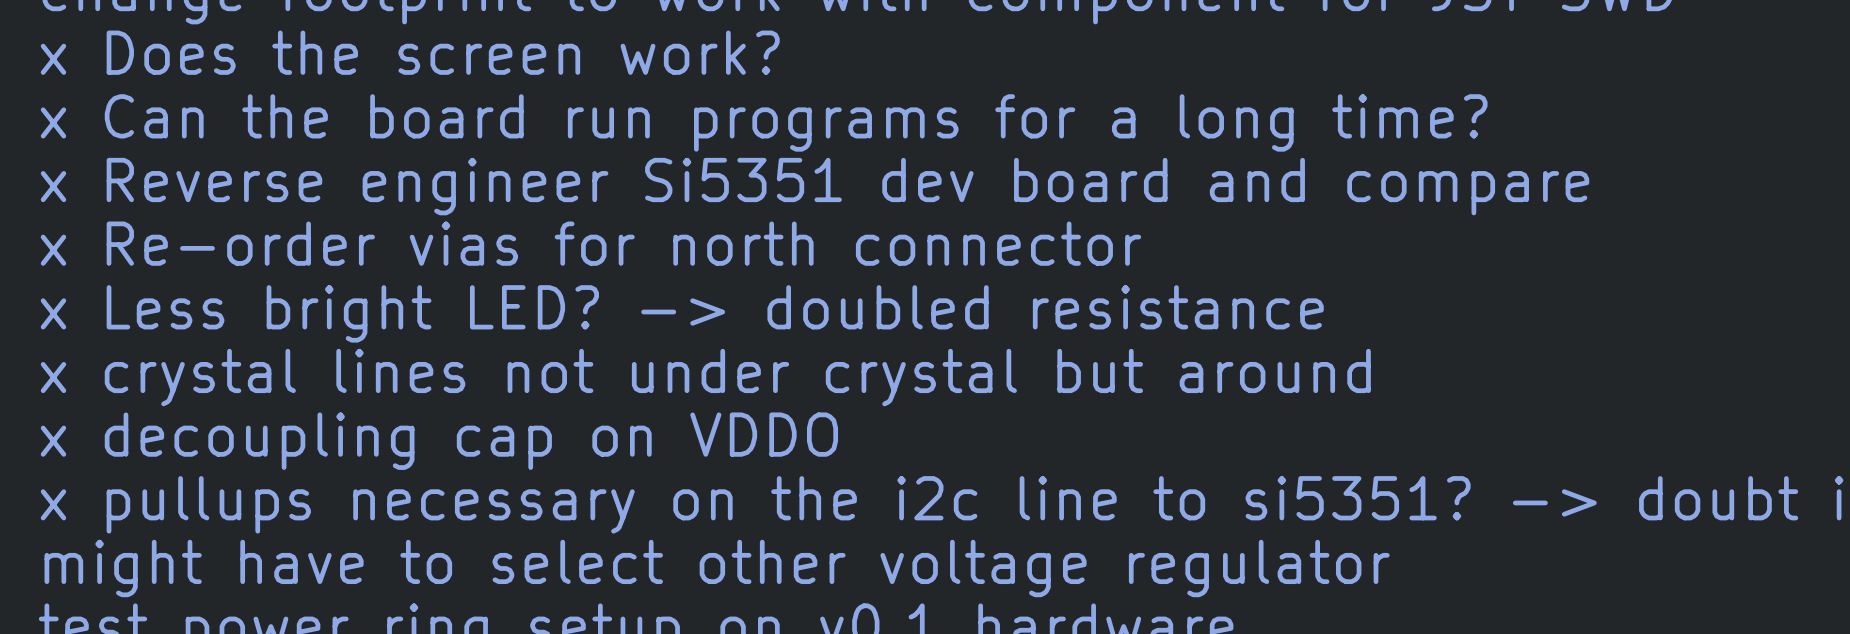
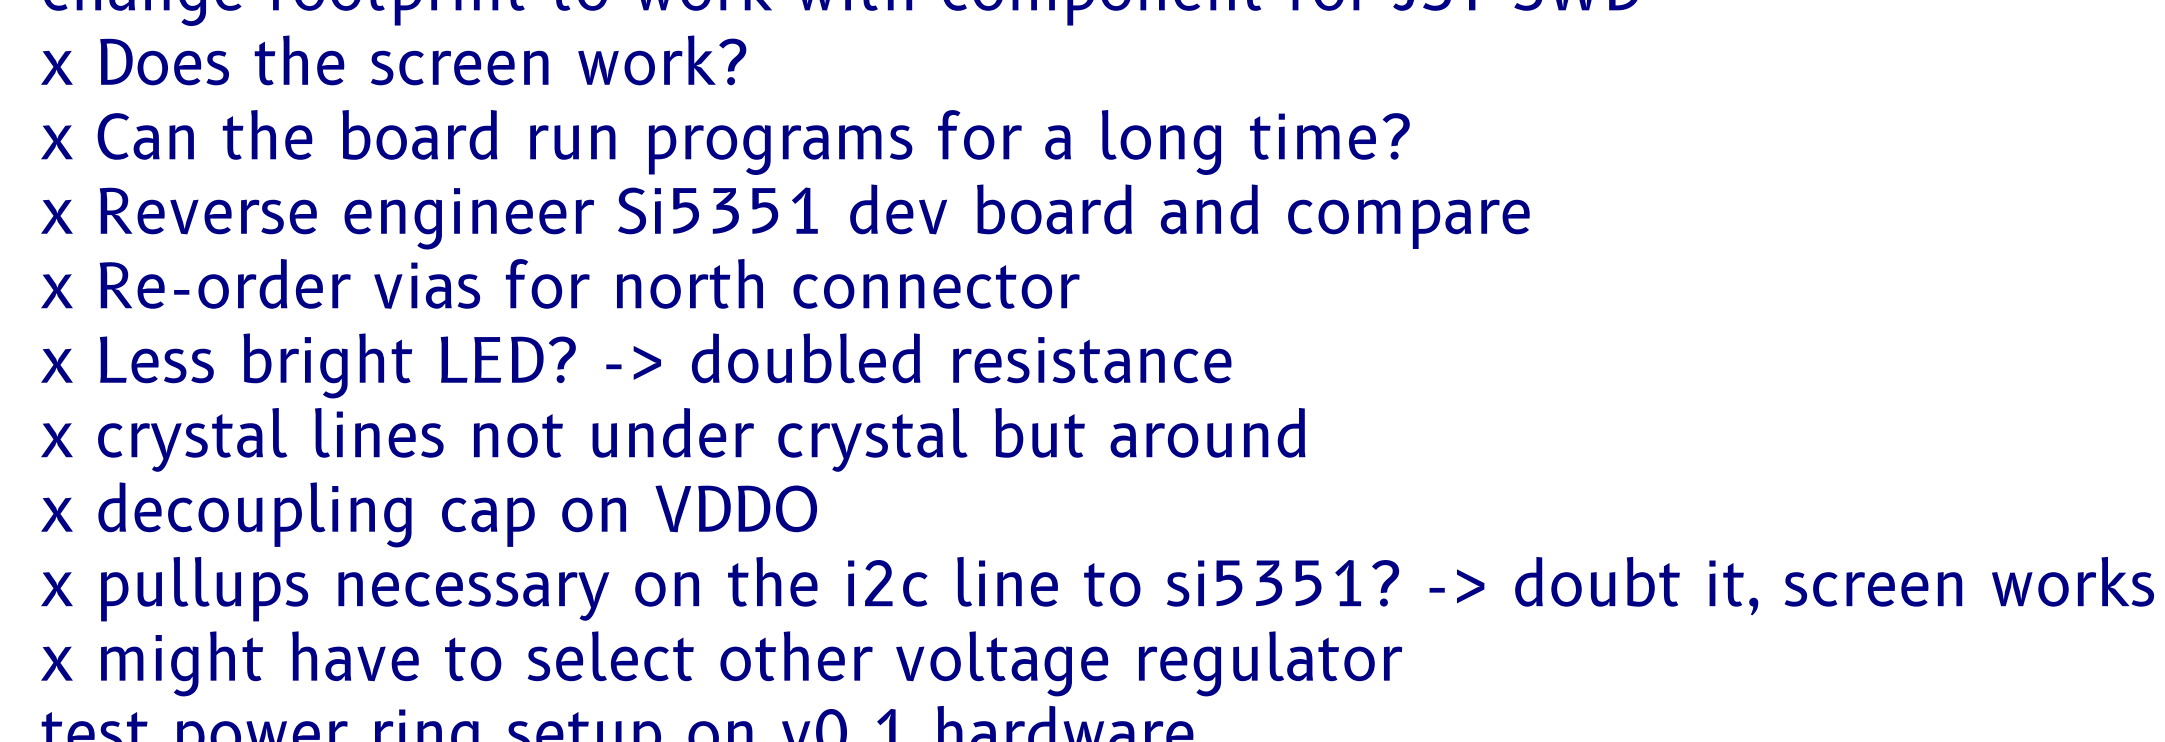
text: might have to select other voltage regulator (717, 568) -> x might have to select other voltage regulator (721, 663)

